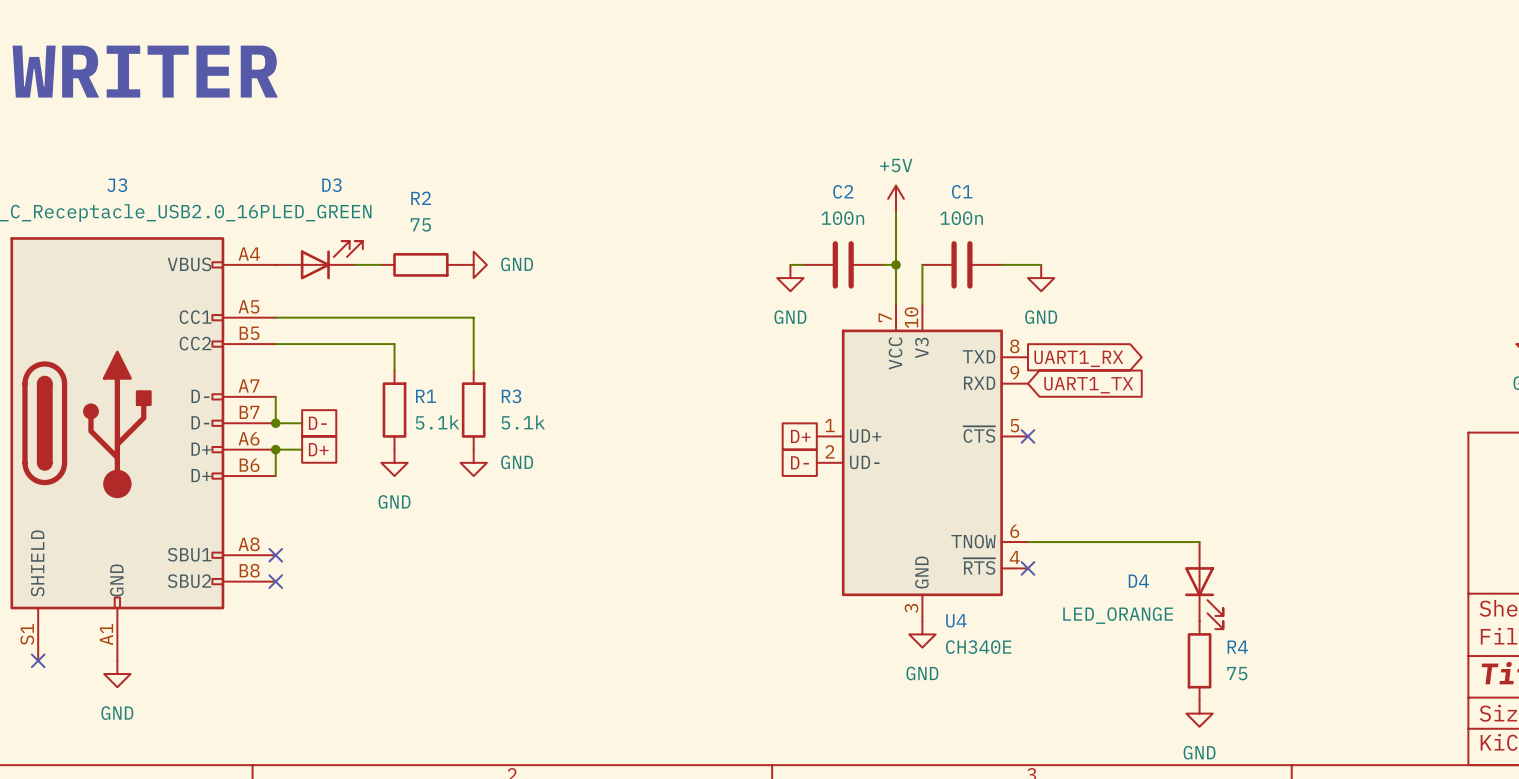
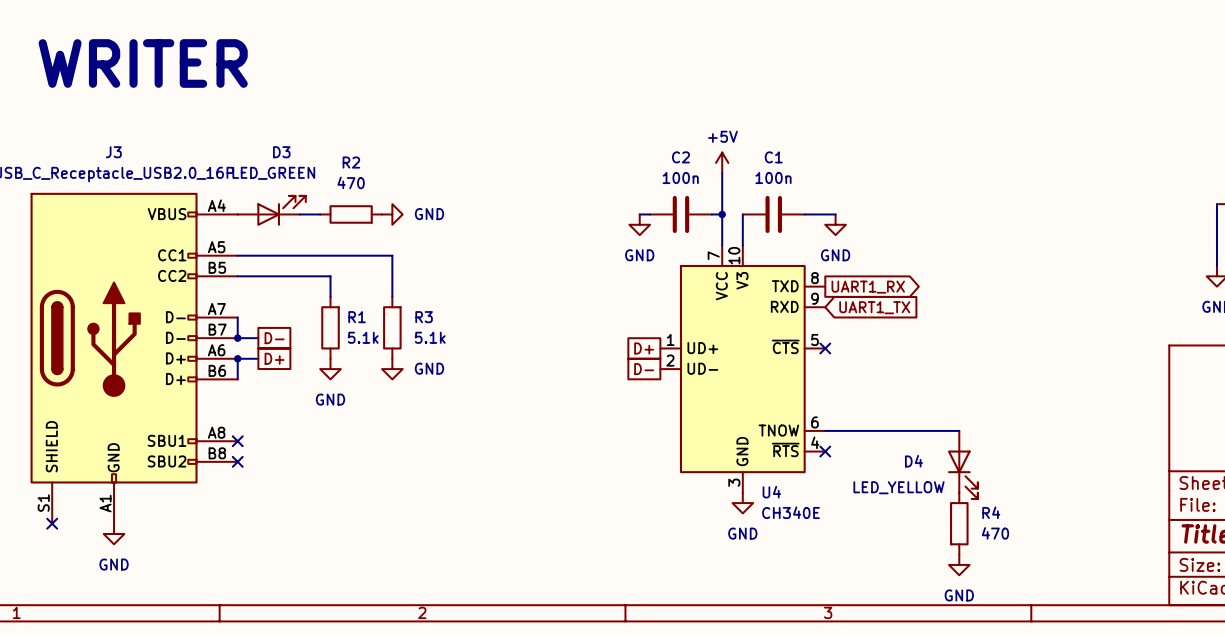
R2 value: 75 (420, 224) -> 470 (351, 182)
D4 value: LED_ORANGE (1118, 615) -> LED_YELLOW (898, 487)
R4 value: 75 (1237, 673) -> 470 (995, 533)

